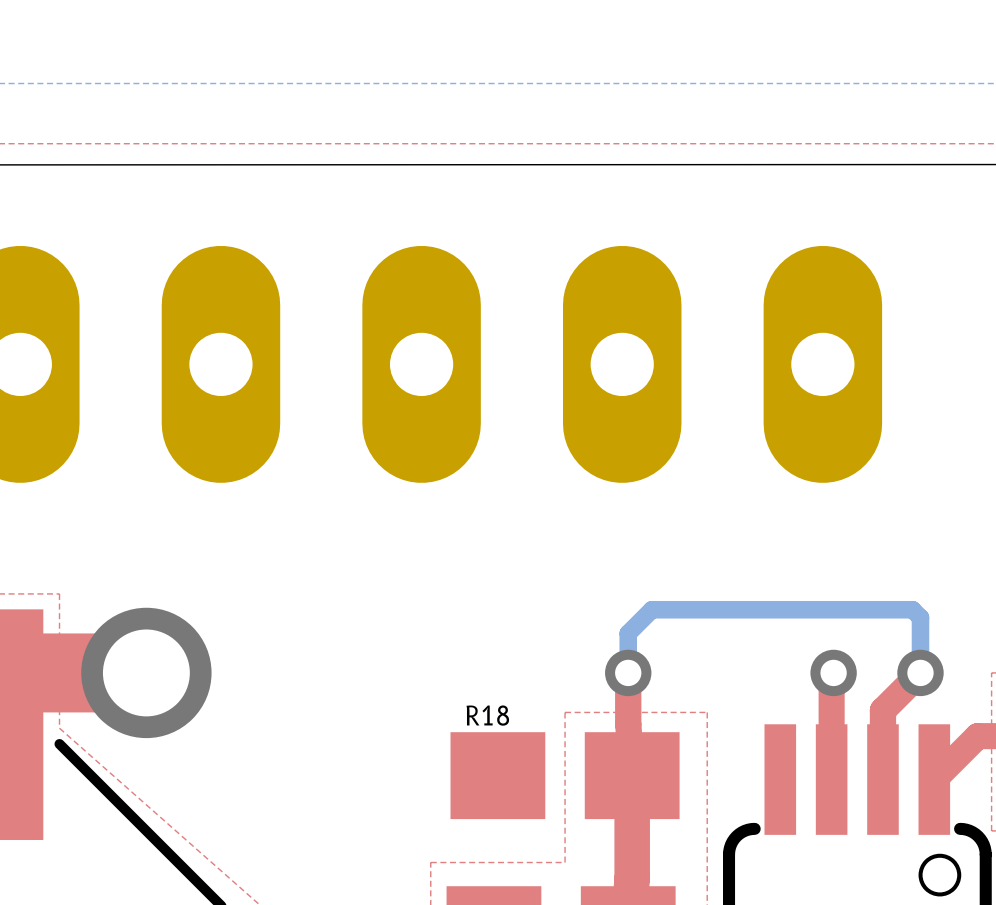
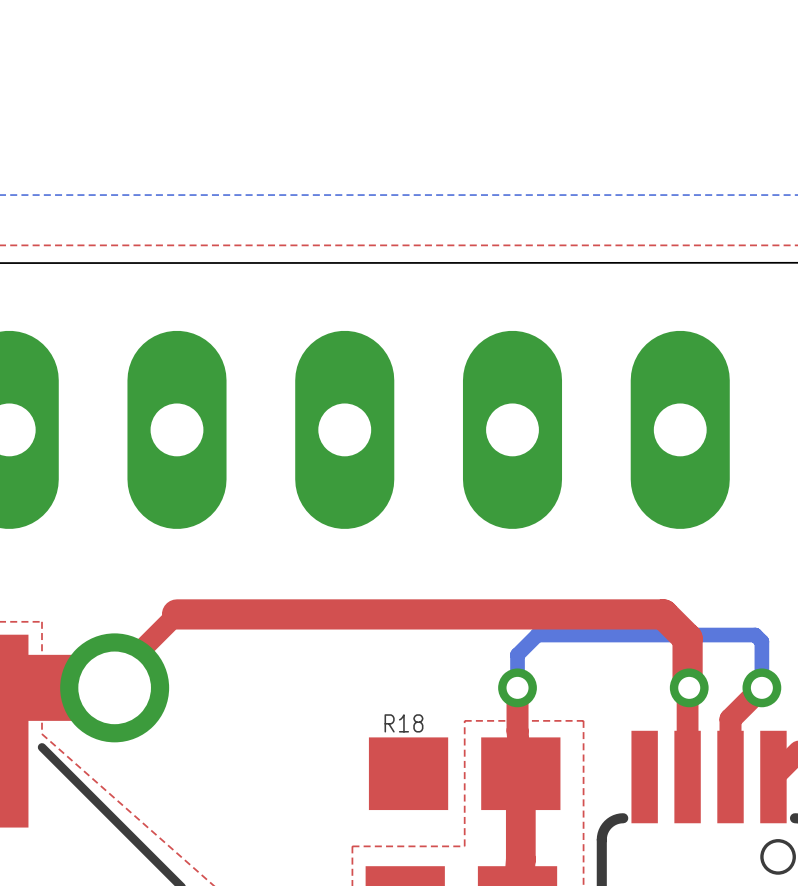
top track: none -> (114, 687) (114, 676) (176, 614) (663, 614) (687, 638) (687, 689)

